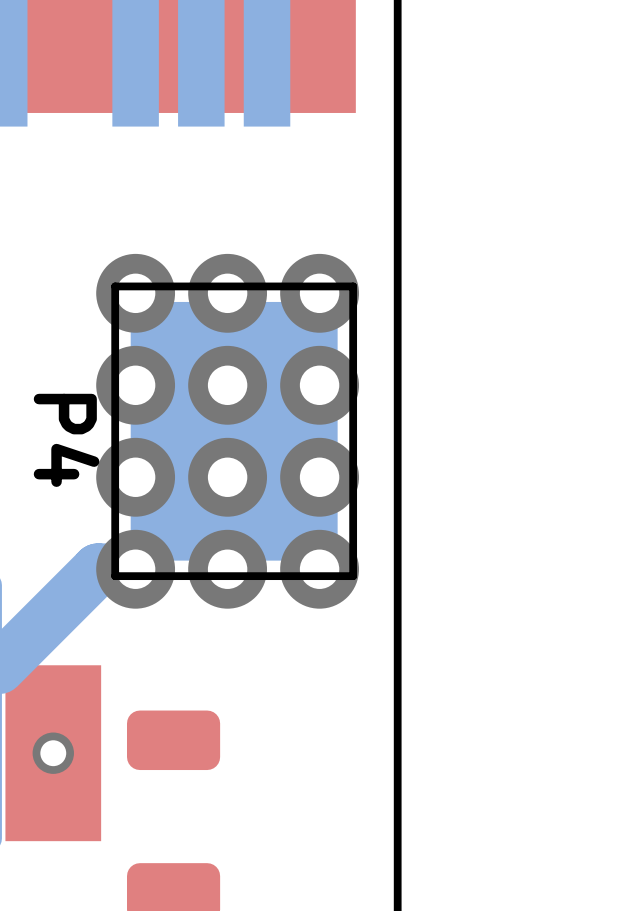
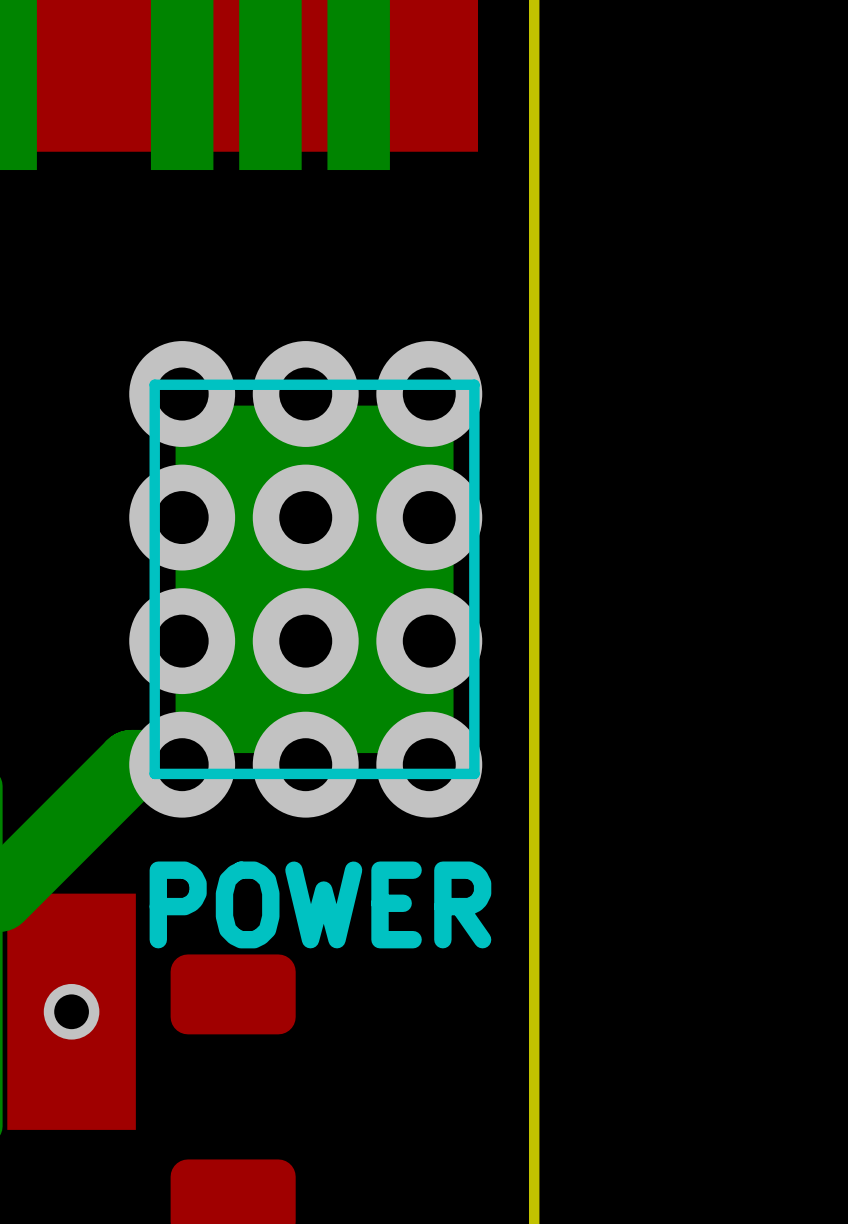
P4 name: P4 (66, 440) -> POWER (320, 904)

